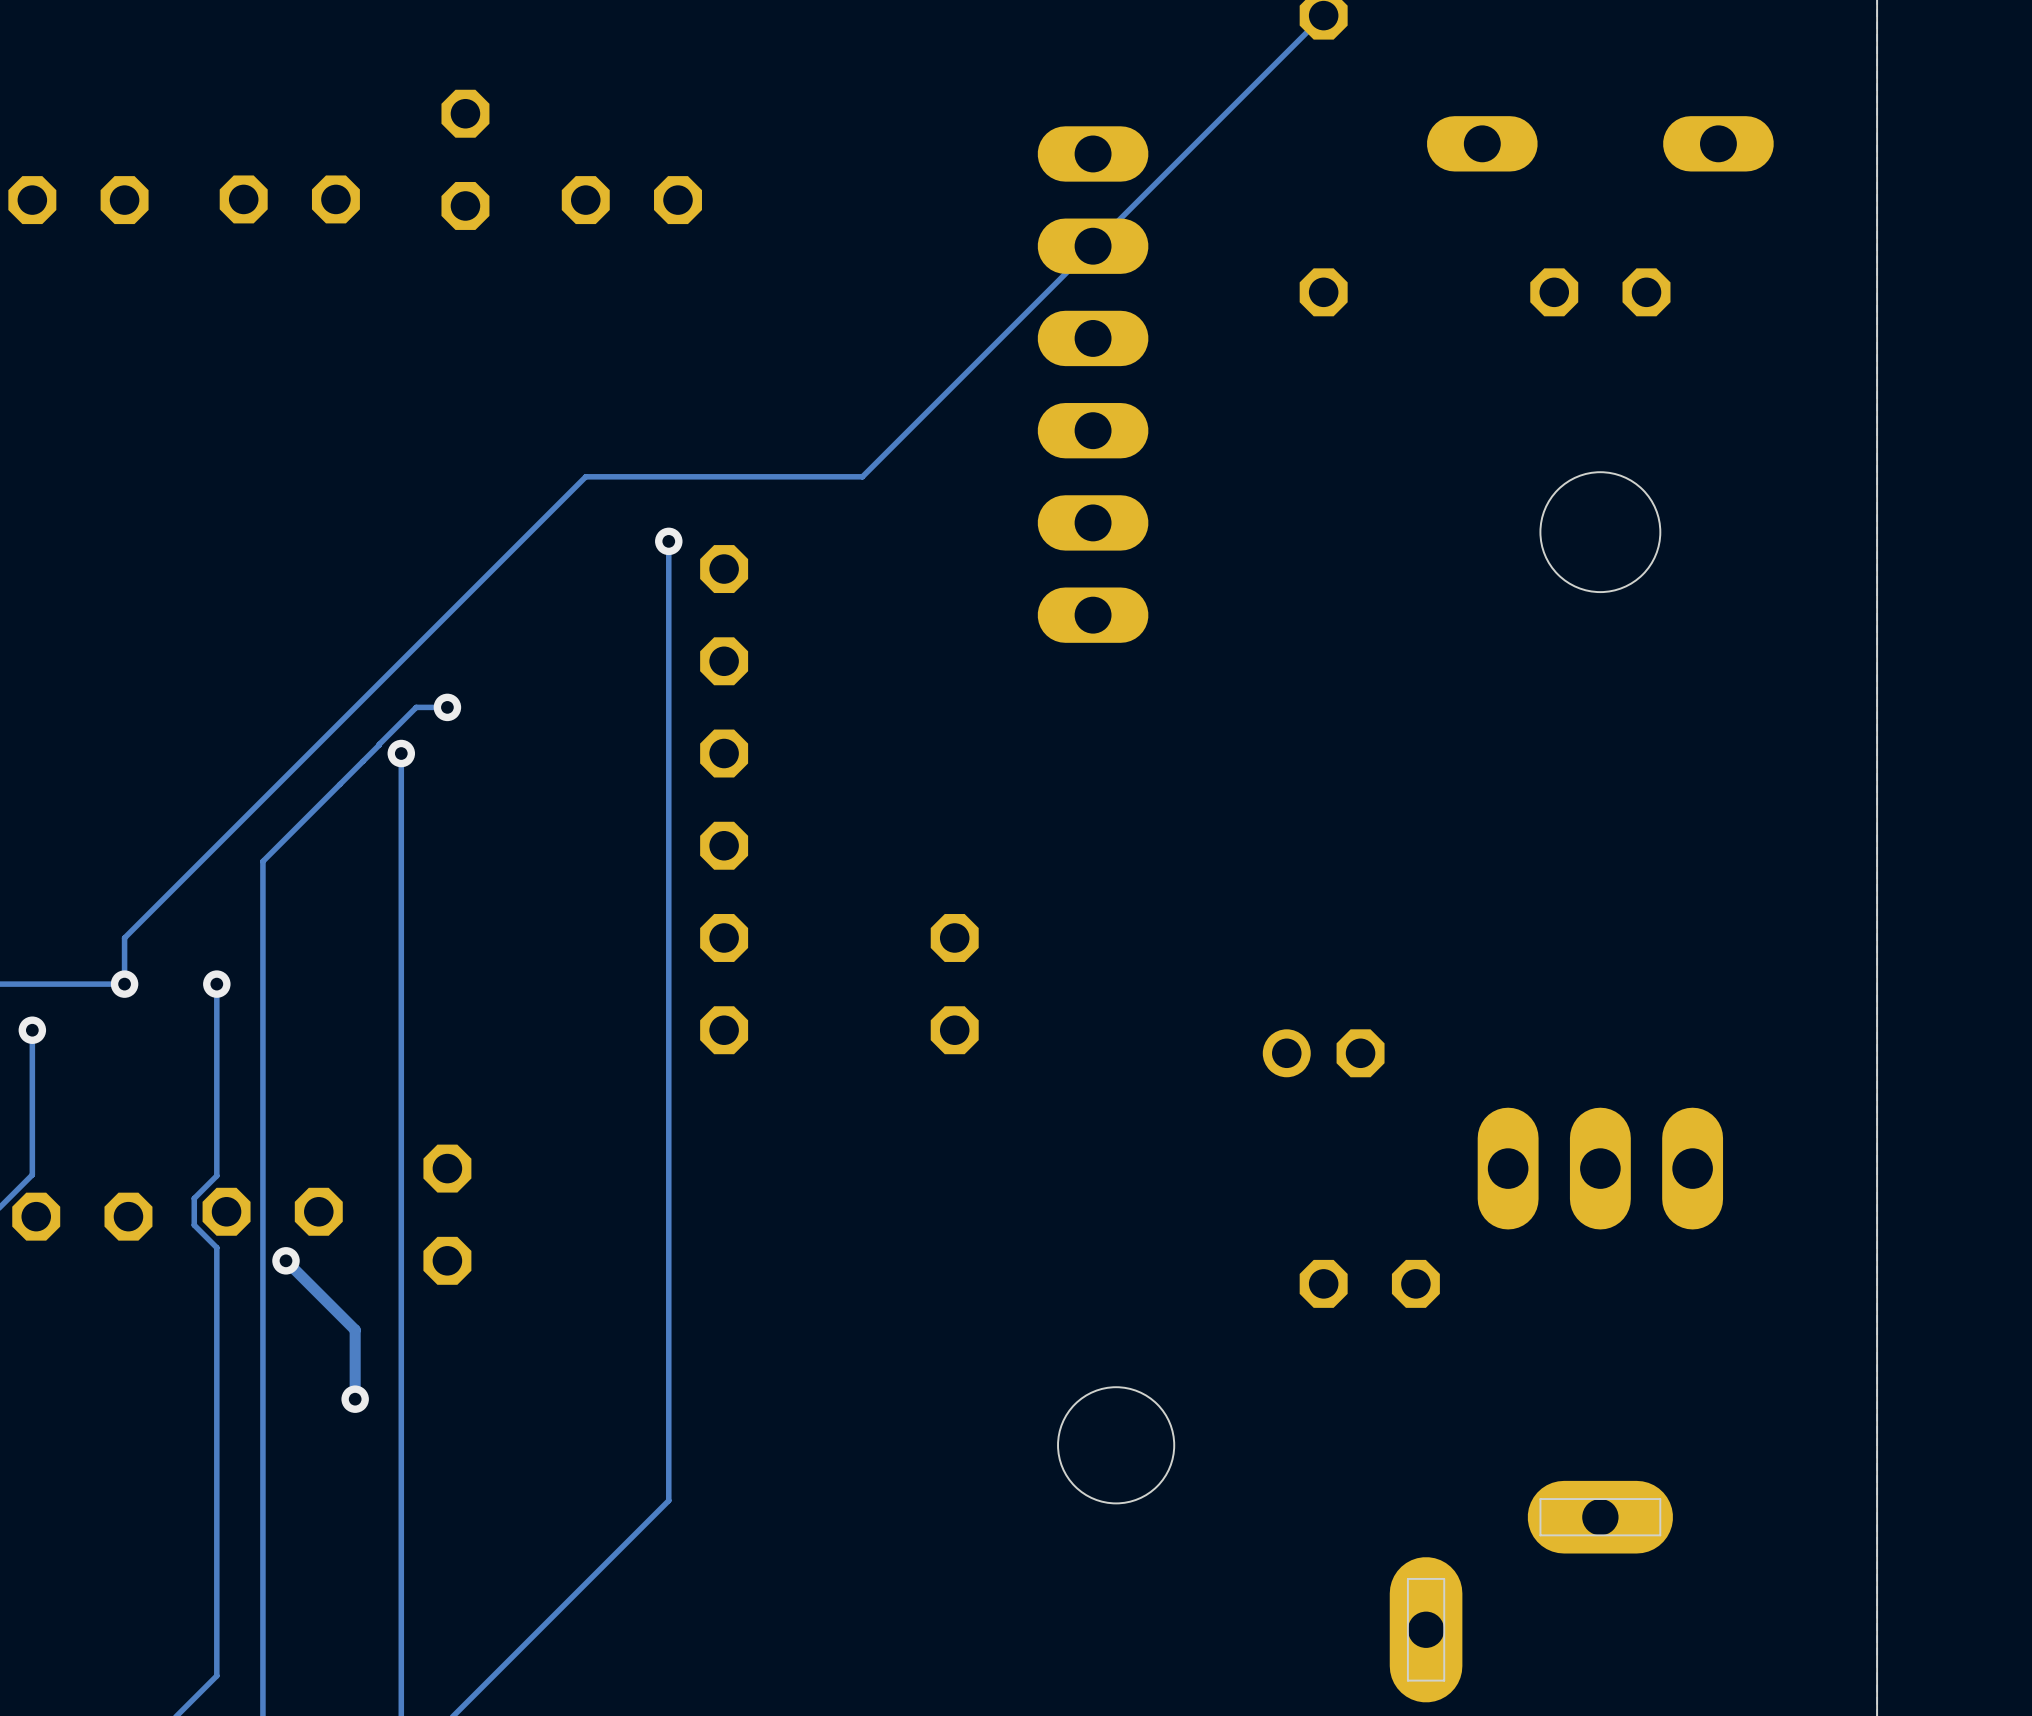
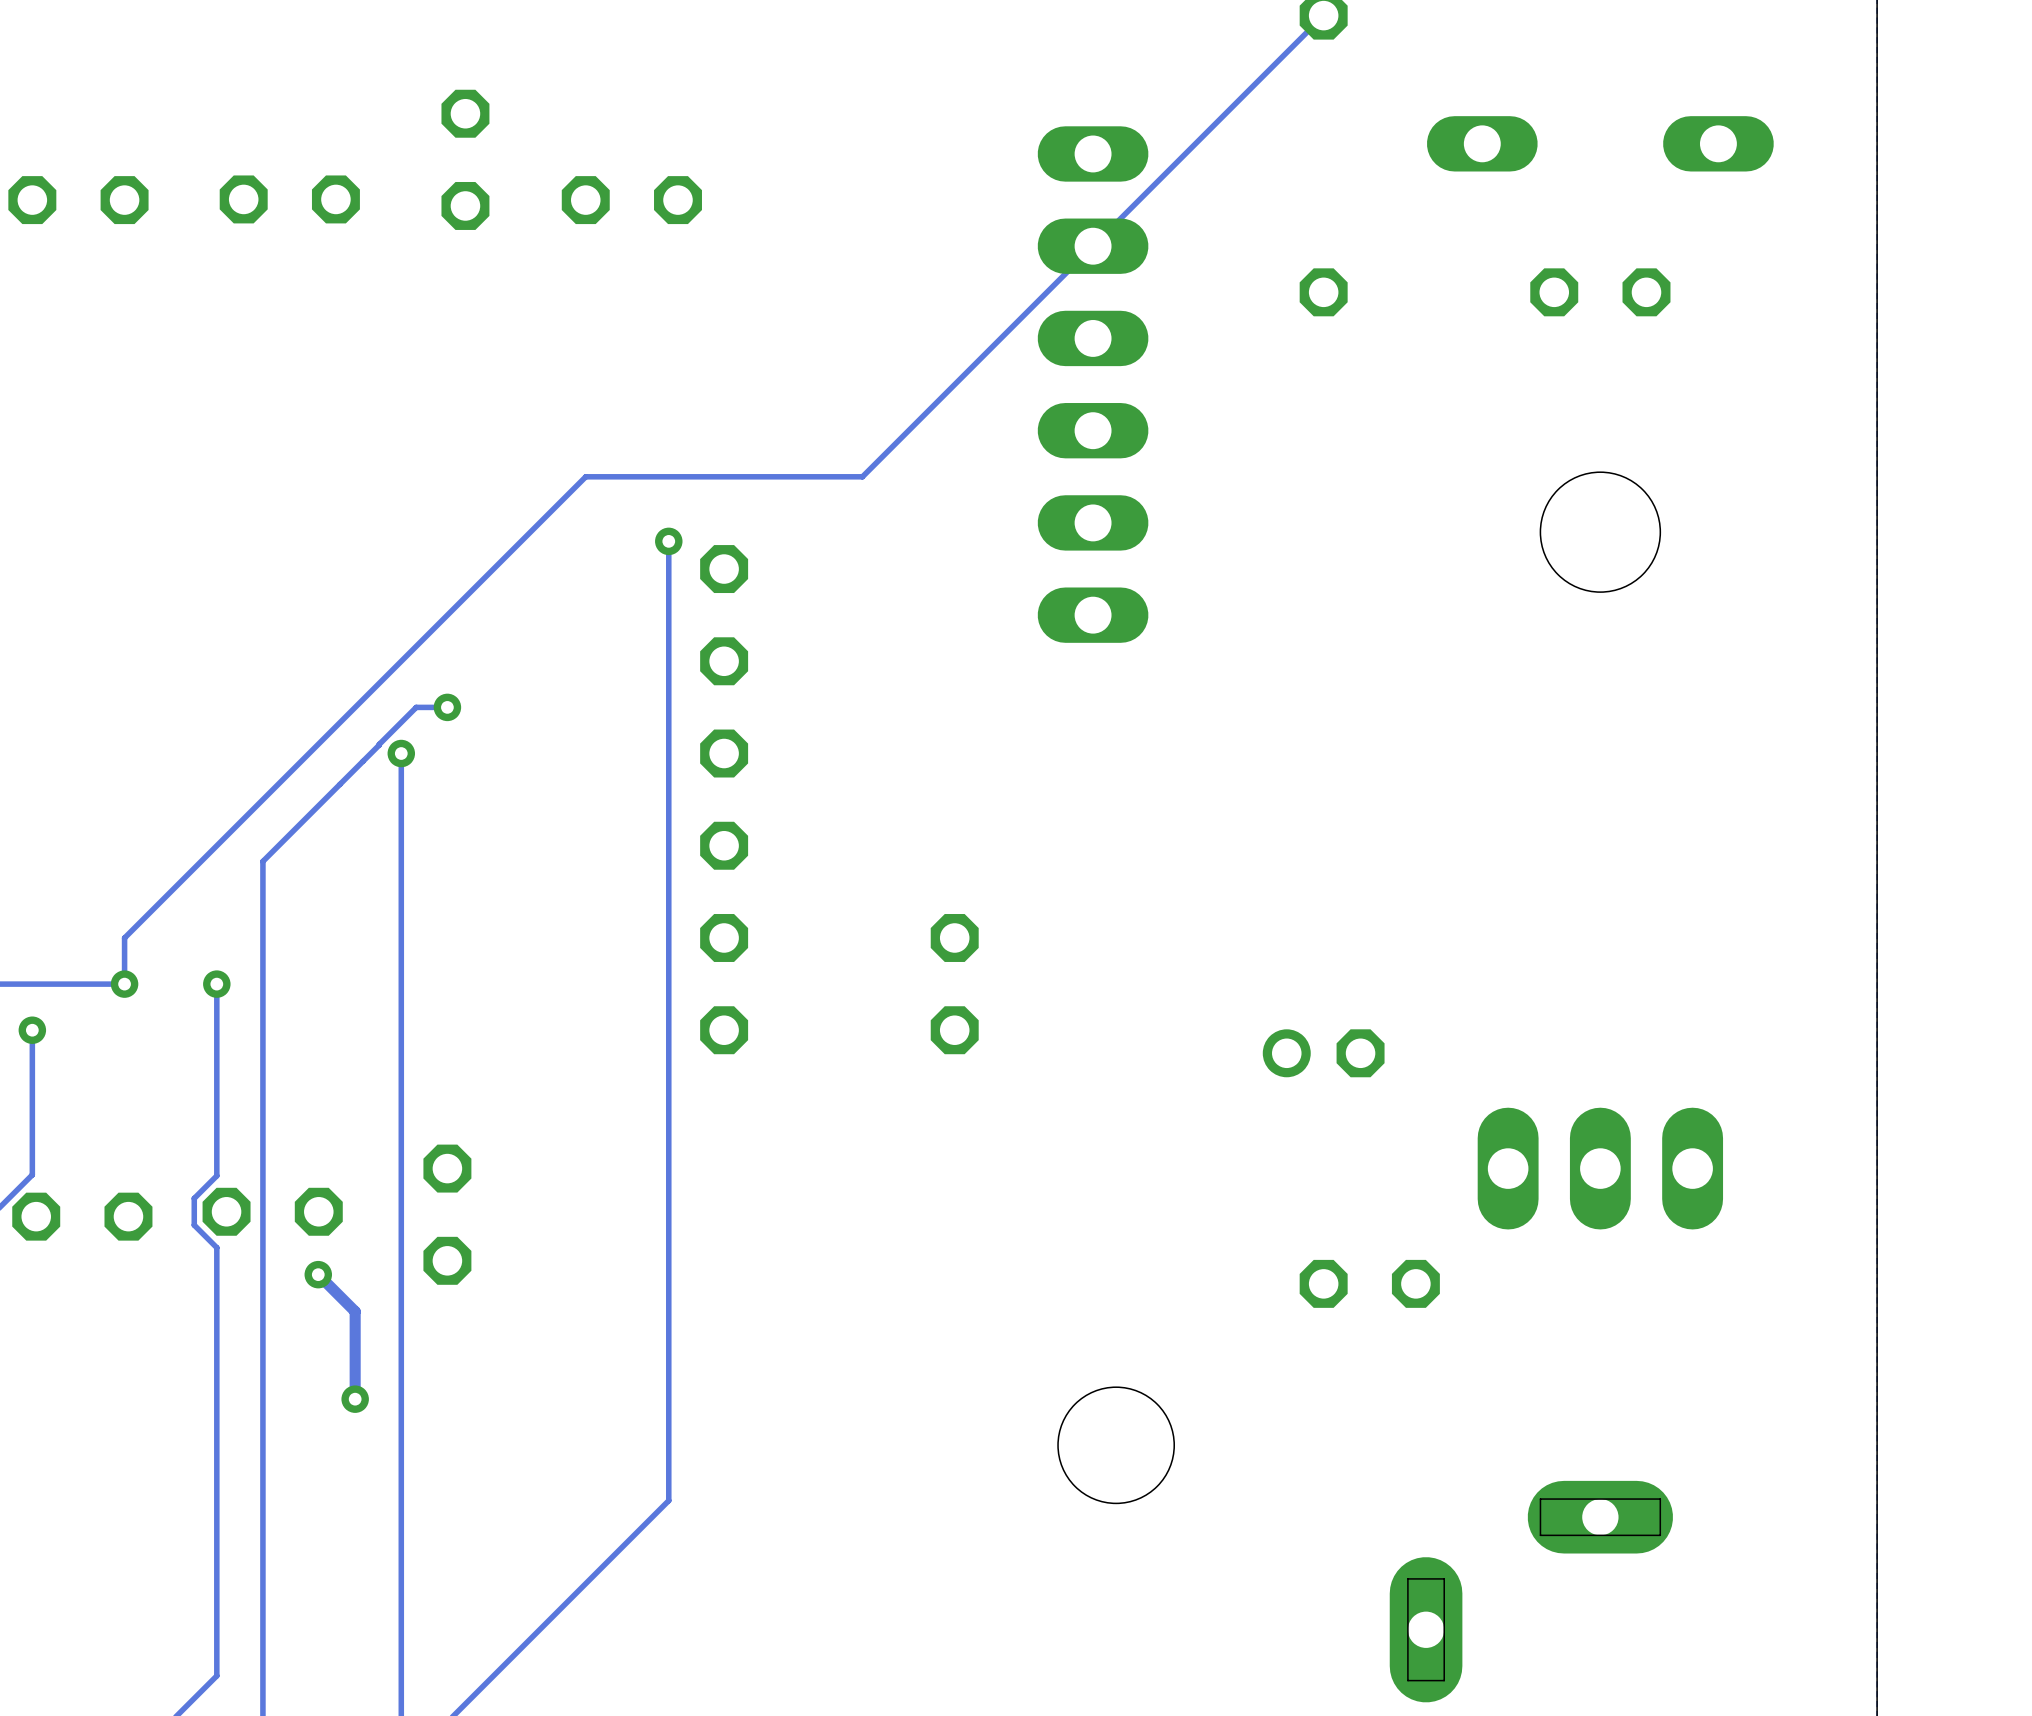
track: (285, 1260) (355, 1330) -> (318, 1274) (355, 1311) (355, 1330)
via position: (285, 1260) -> (318, 1274)

